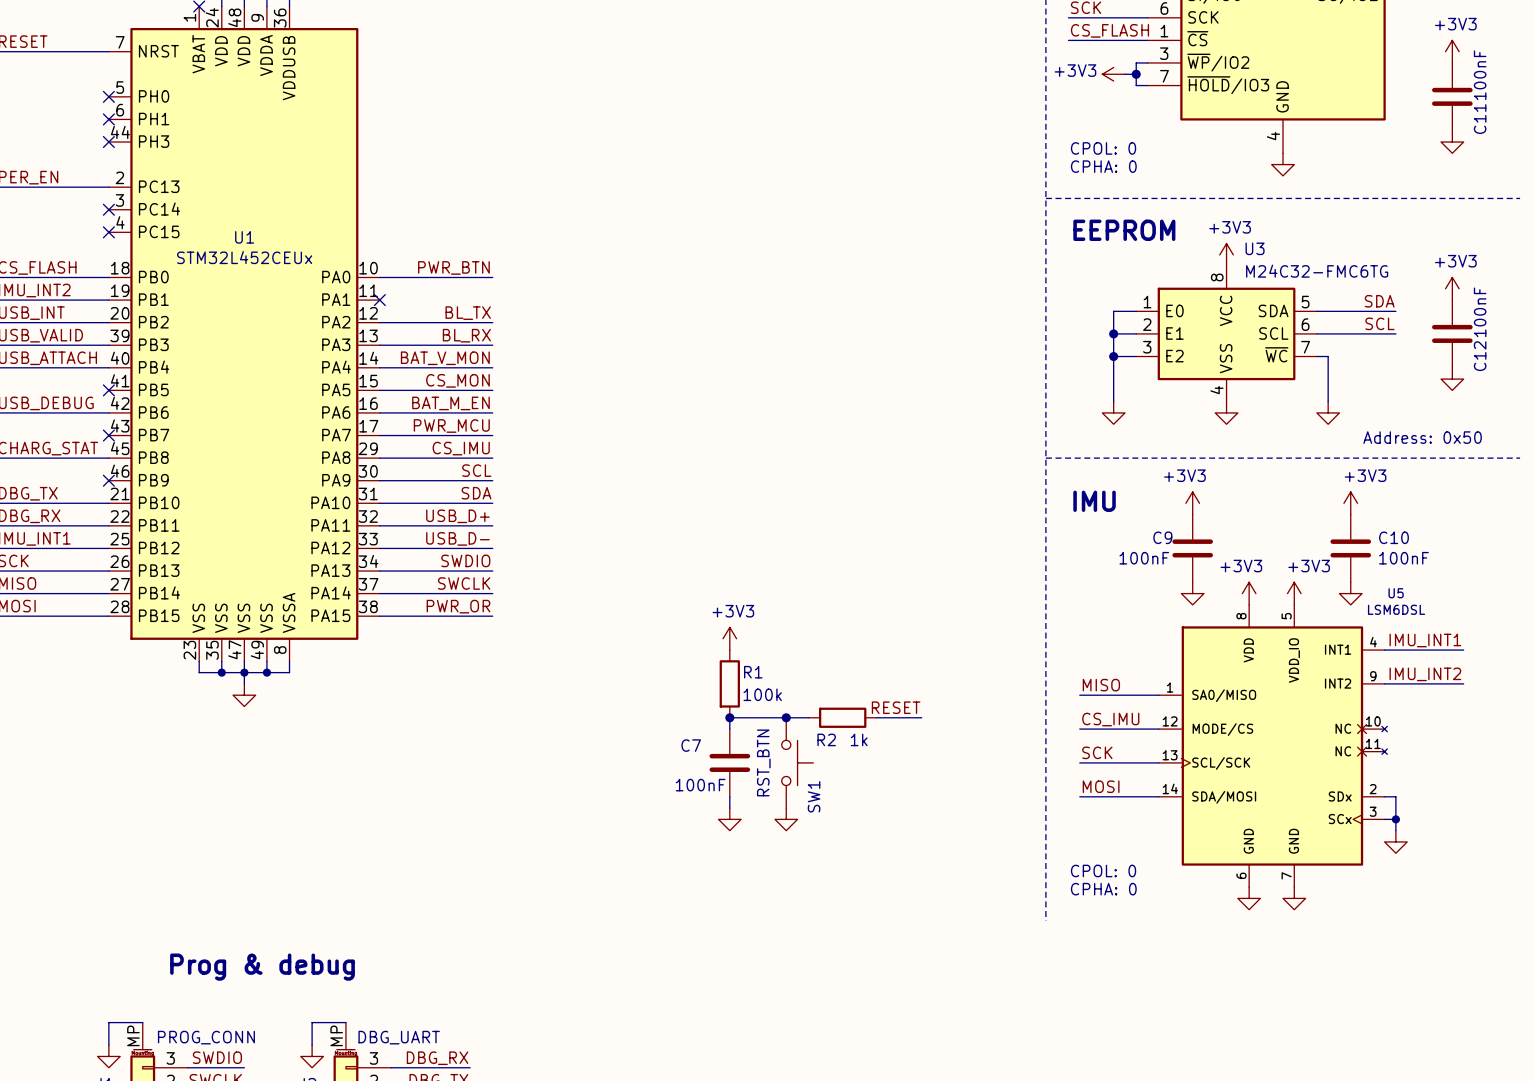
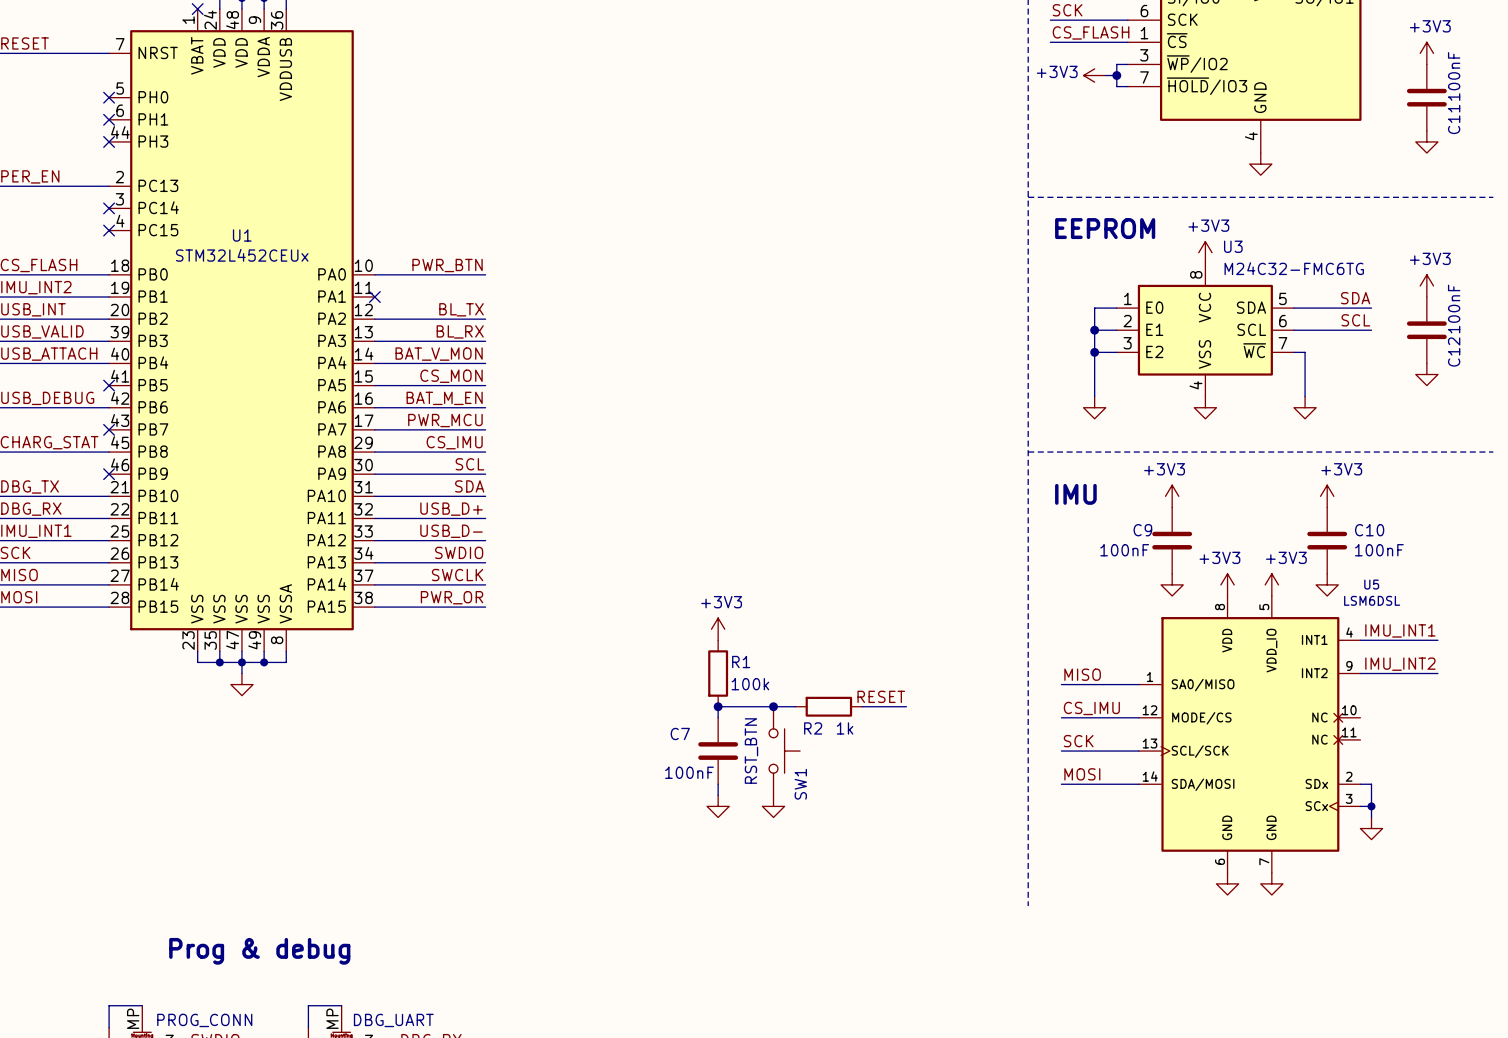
text: CPOL: 0 (1103, 148) -> none
text: CPHA: 0 (1103, 166) -> none
text: Address: 0x50 (1422, 437) -> none
U5 symbol: [1158, 604, 1388, 888] -> [1138, 595, 1361, 873]
text: CPOL: 0 (1103, 870) -> none
text: CPHA: 0 (1103, 889) -> none

